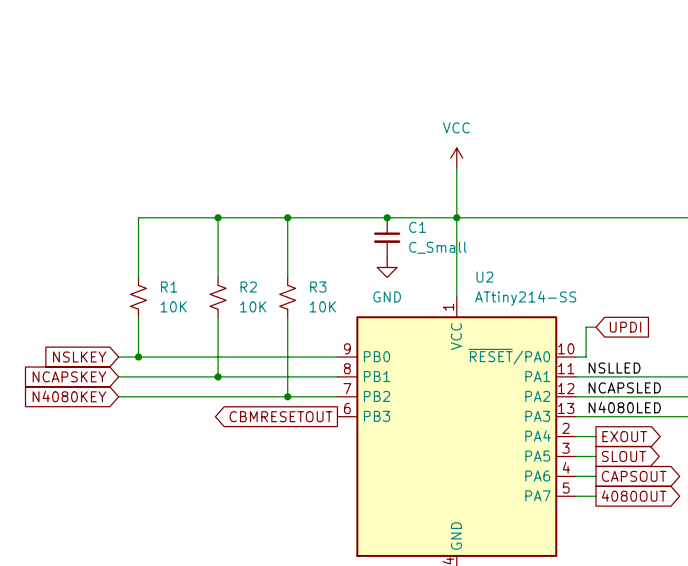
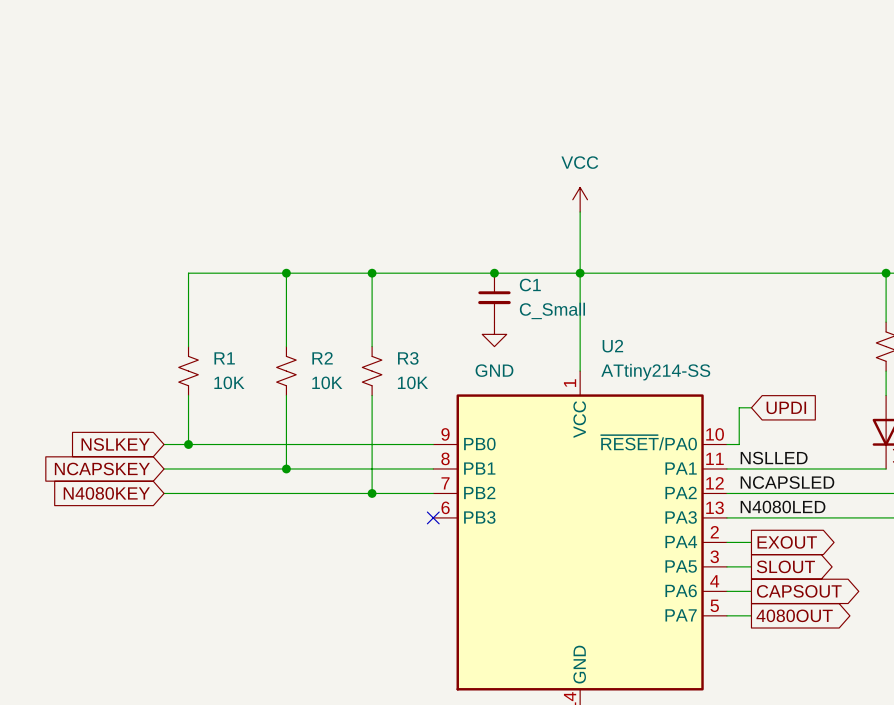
global label: CBMRESETOUT (281, 416) -> none
no-connect mark: none -> (433, 517)

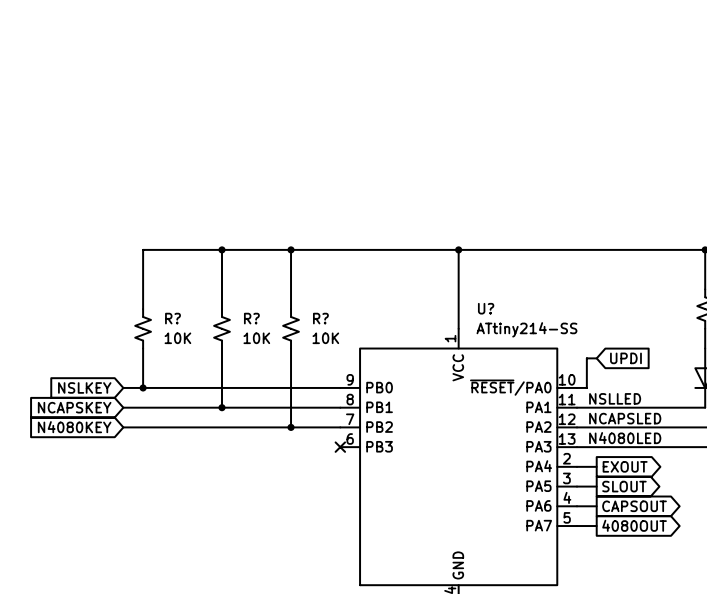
power symbol: VCC (580, 199) -> none
wire: (580, 211) (580, 273) -> none
junction: (494, 273) -> none
C1: C_Small (494, 297) -> none
power symbol: GND (494, 334) -> none
U2 name: U2 (612, 346) -> U? (486, 308)
R1 name: R1 (224, 358) -> R? (173, 318)
R2 name: R2 (322, 358) -> R? (251, 318)
R3 name: R3 (408, 358) -> R? (320, 318)

